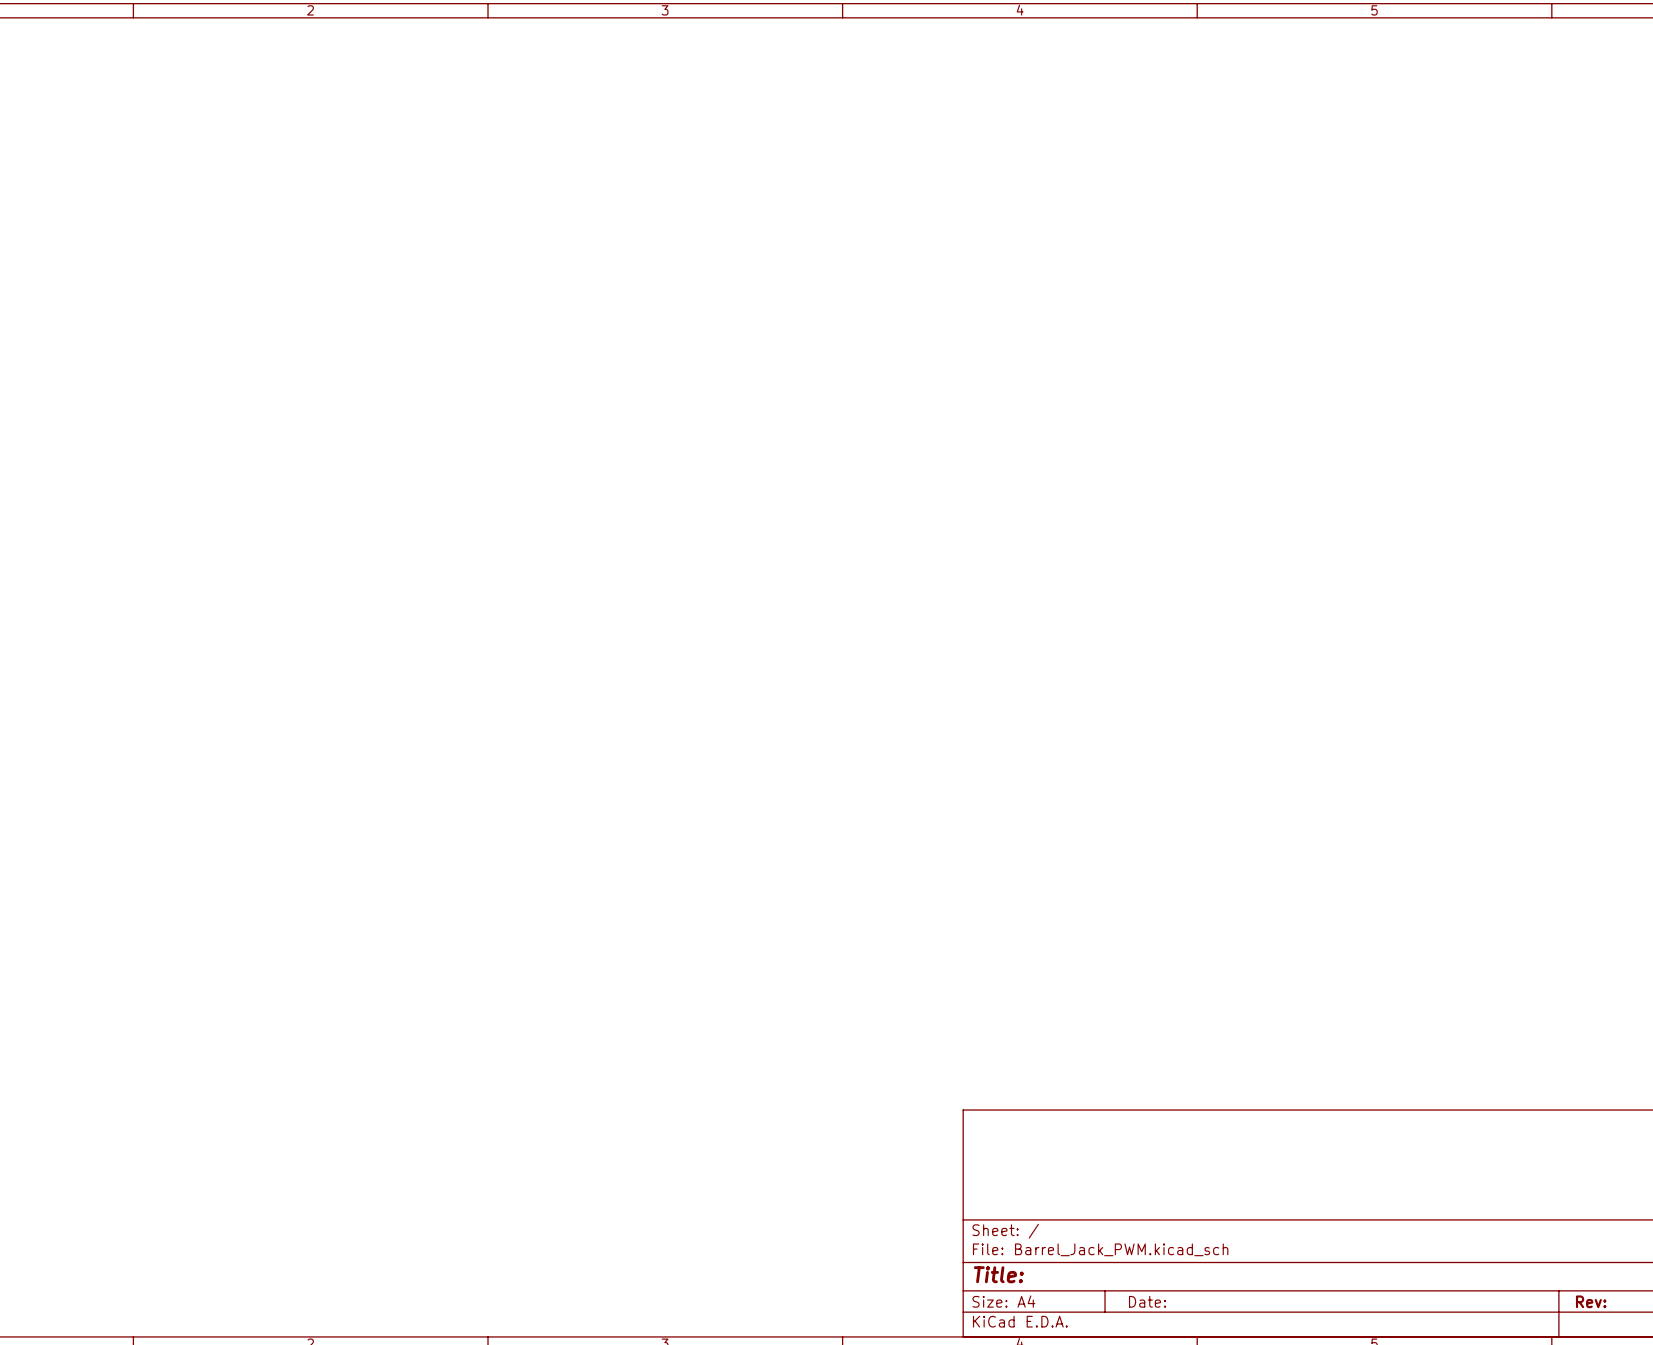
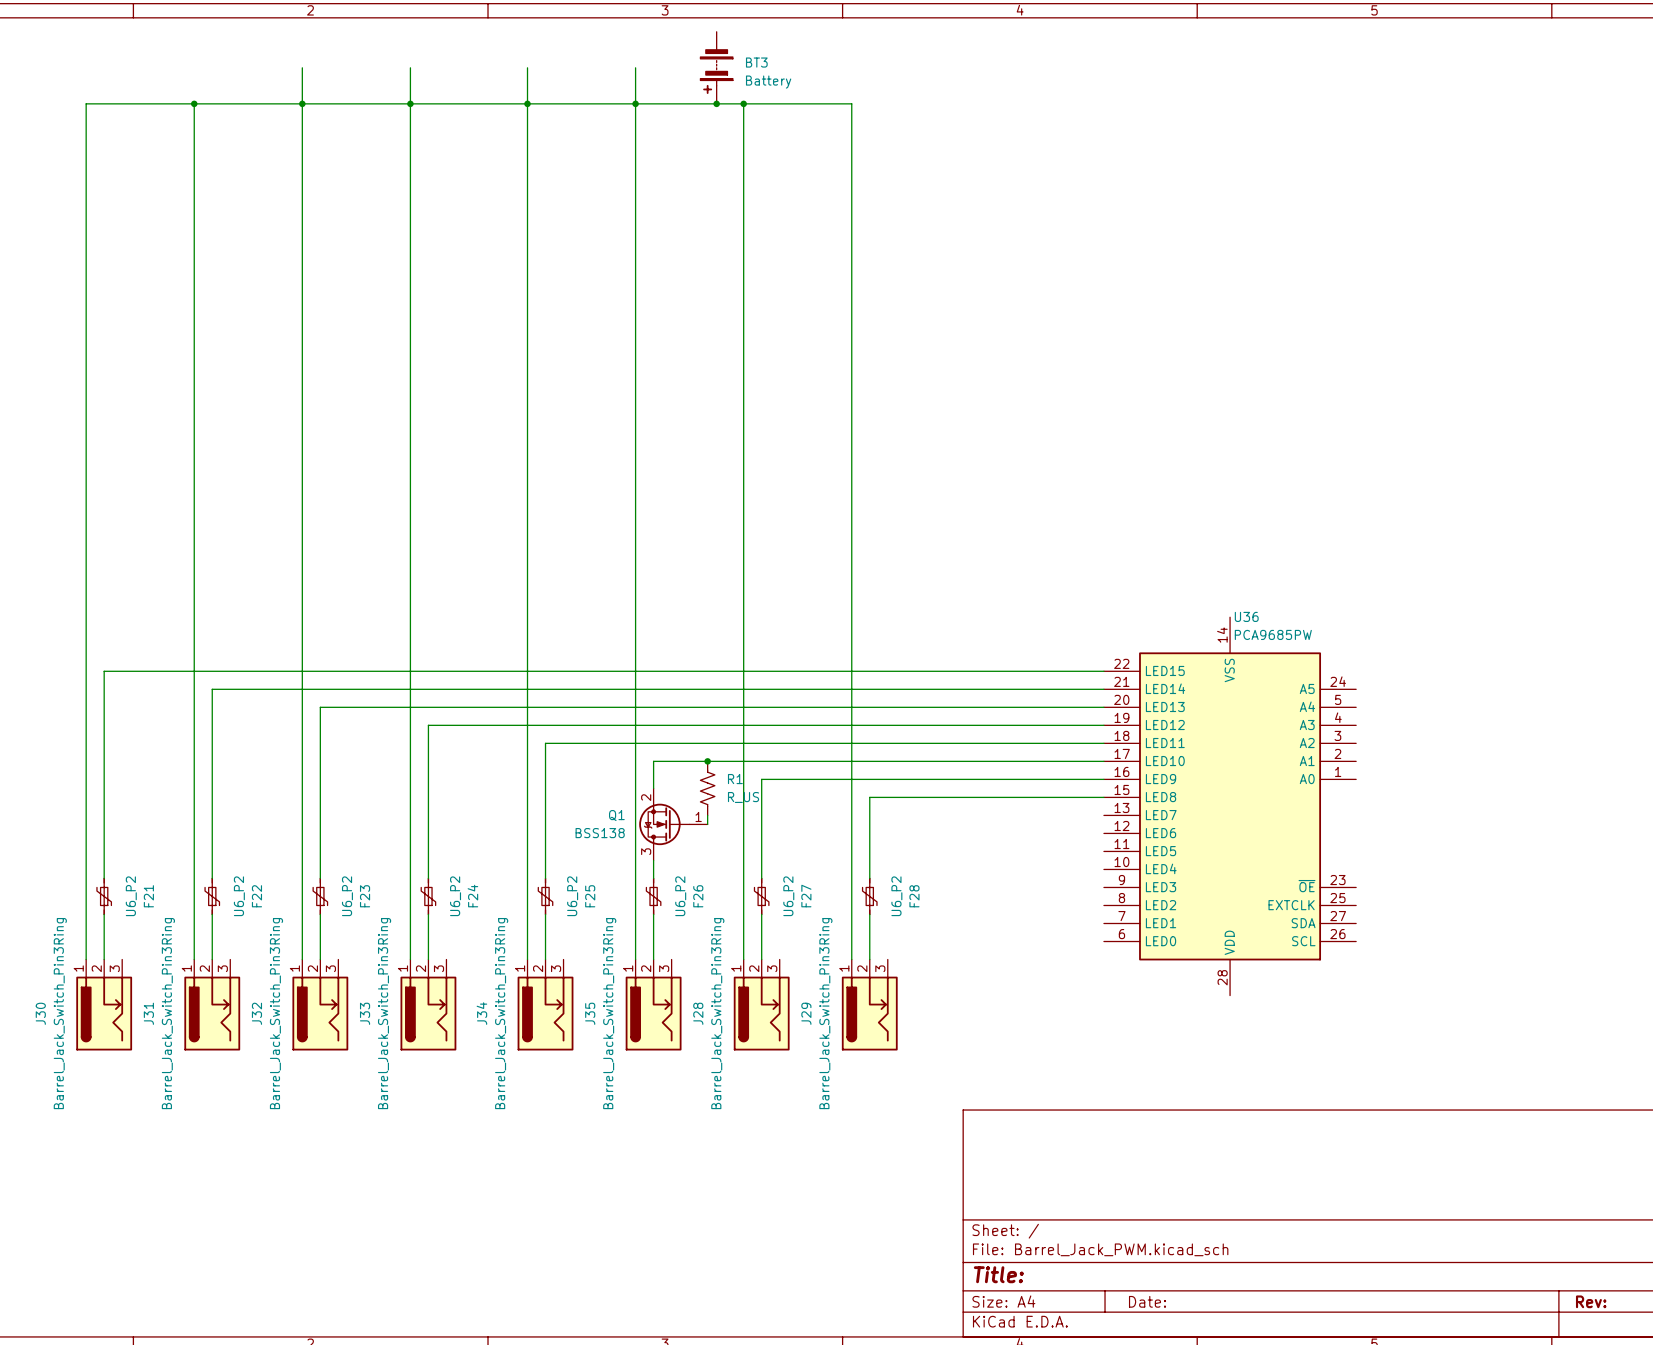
wire: none -> (302, 67) (302, 959)
wire: none -> (410, 67) (410, 959)
wire: none -> (527, 67) (527, 959)
wire: none -> (635, 67) (635, 959)
BT3: none -> Battery (716, 67)
wire: none -> (194, 103) (194, 959)
junction: none -> (194, 103)
junction: none -> (302, 103)
junction: none -> (410, 103)
junction: none -> (527, 103)
junction: none -> (635, 103)
junction: none -> (716, 103)
wire: none -> (743, 103) (743, 959)
junction: none -> (743, 103)
wire: none -> (1103, 671) (104, 671) (104, 878)
wire: none -> (1103, 689) (212, 689) (212, 878)
wire: none -> (1103, 707) (320, 707) (320, 878)
wire: none -> (1103, 725) (428, 725) (428, 878)
wire: none -> (1103, 743) (545, 743) (545, 878)
junction: none -> (707, 761)
wire: none -> (1103, 761) (653, 761) (653, 788)
wire: none -> (1103, 779) (761, 779) (761, 878)
R1: none -> R_US (707, 788)
wire: none -> (1103, 797) (869, 797) (869, 878)
U36: none -> PCA9685PW (1230, 806)
wire: none -> (707, 815) (707, 824)
Q1: none -> BSS138 (673, 824)
wire: none -> (653, 860) (653, 878)
F21: none -> U6_P2 (104, 896)
F22: none -> U6_P2 (212, 896)
F23: none -> U6_P2 (320, 896)
F24: none -> U6_P2 (428, 896)
F25: none -> U6_P2 (545, 896)
F26: none -> U6_P2 (653, 896)
F27: none -> U6_P2 (761, 896)
F28: none -> U6_P2 (869, 896)
wire: none -> (104, 914) (104, 959)
wire: none -> (212, 914) (212, 959)
wire: none -> (320, 914) (320, 959)
wire: none -> (428, 914) (428, 959)
wire: none -> (545, 914) (545, 959)
wire: none -> (653, 914) (653, 959)
wire: none -> (761, 914) (761, 959)
wire: none -> (869, 914) (869, 959)
wire: none -> (86, 959) (86, 103) (851, 103) (851, 959)
J30: none -> Barrel_Jack_Switch_Pin3Ring (104, 1005)
J31: none -> Barrel_Jack_Switch_Pin3Ring (212, 1005)
J32: none -> Barrel_Jack_Switch_Pin3Ring (320, 1005)
J33: none -> Barrel_Jack_Switch_Pin3Ring (428, 1005)
J34: none -> Barrel_Jack_Switch_Pin3Ring (545, 1005)
J35: none -> Barrel_Jack_Switch_Pin3Ring (653, 1005)
J28: none -> Barrel_Jack_Switch_Pin3Ring (761, 1005)
J29: none -> Barrel_Jack_Switch_Pin3Ring (869, 1005)

